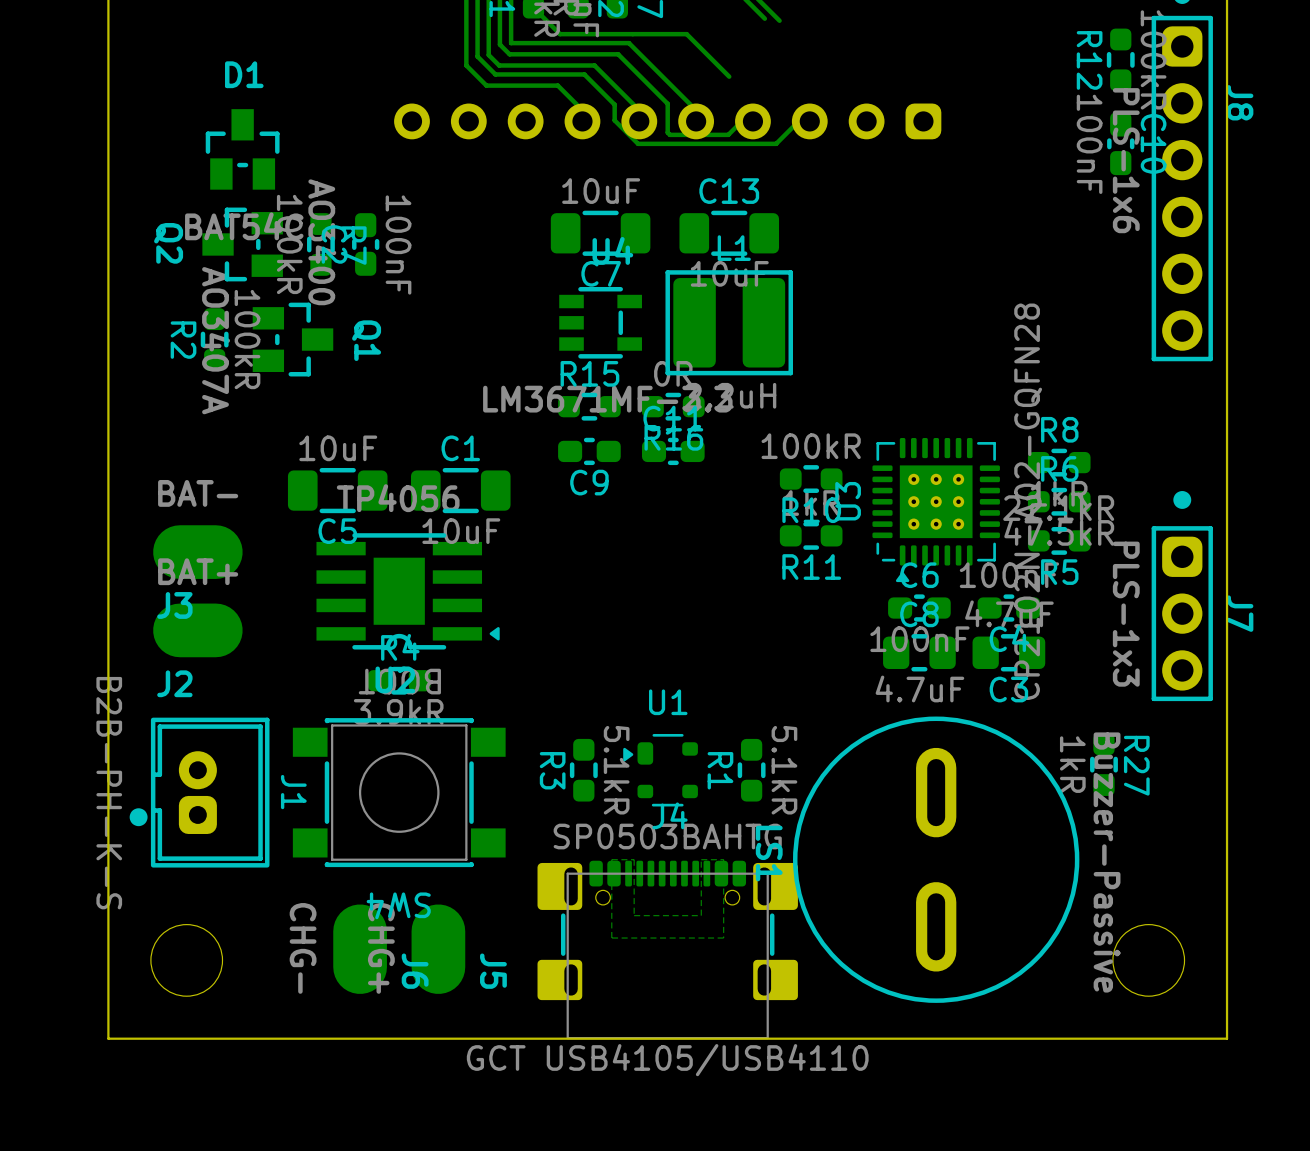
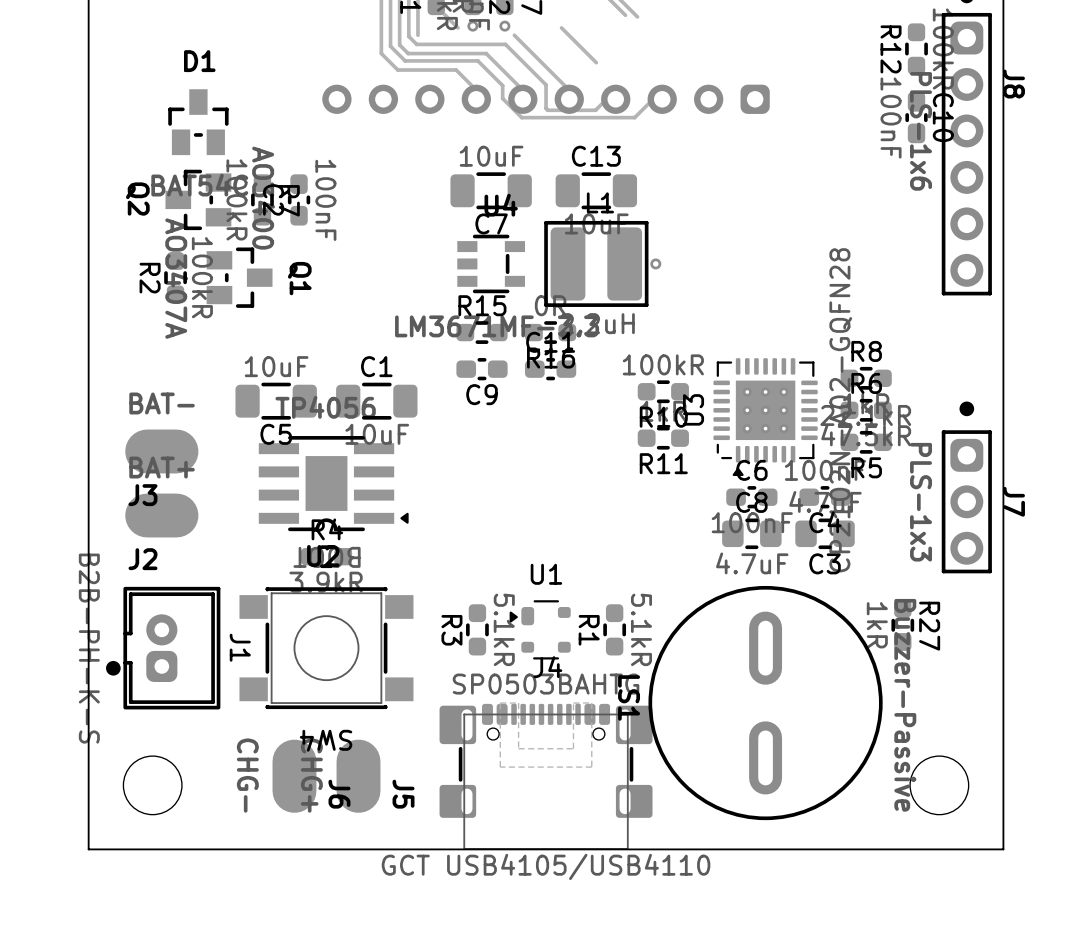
via: none -> (472, 26)
via: none -> (504, 26)
track: (686, 34) (560, 34) -> none
track: (629, 43) (511, 43) -> none
via: none -> (655, 263)

